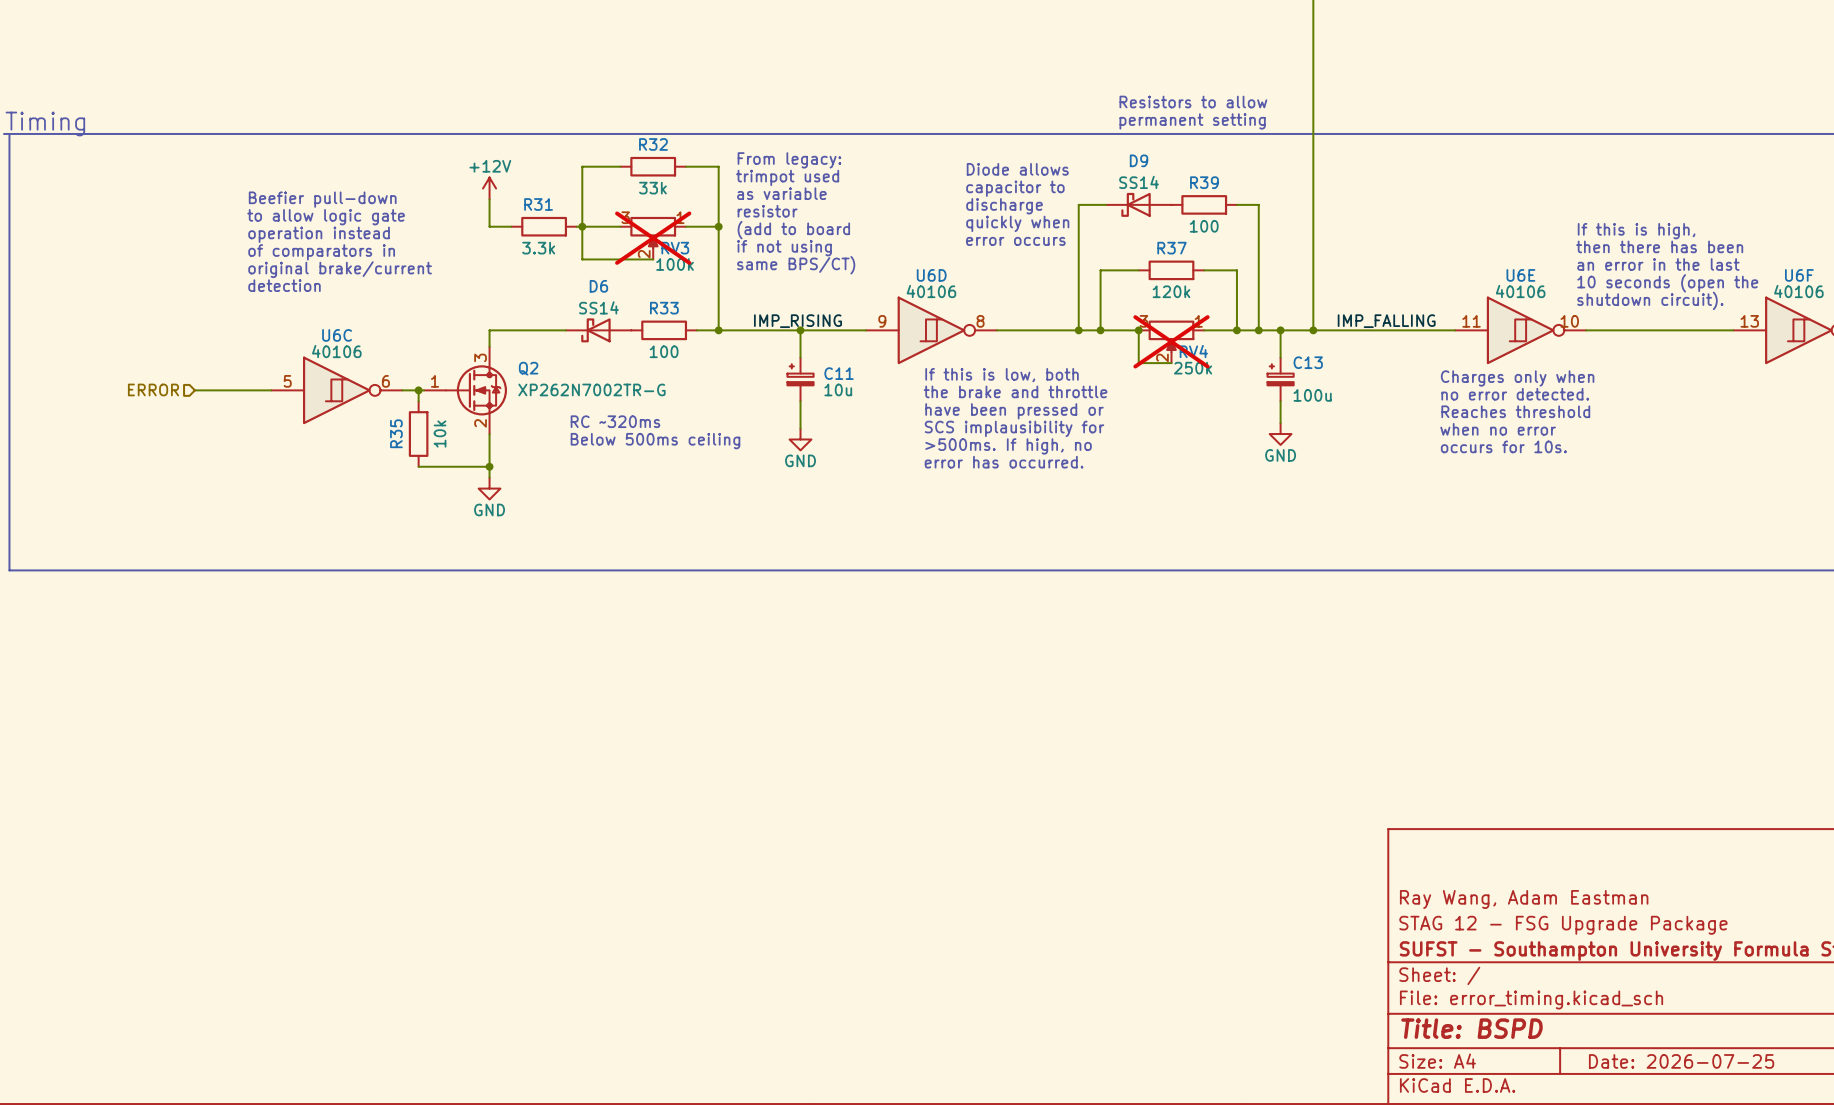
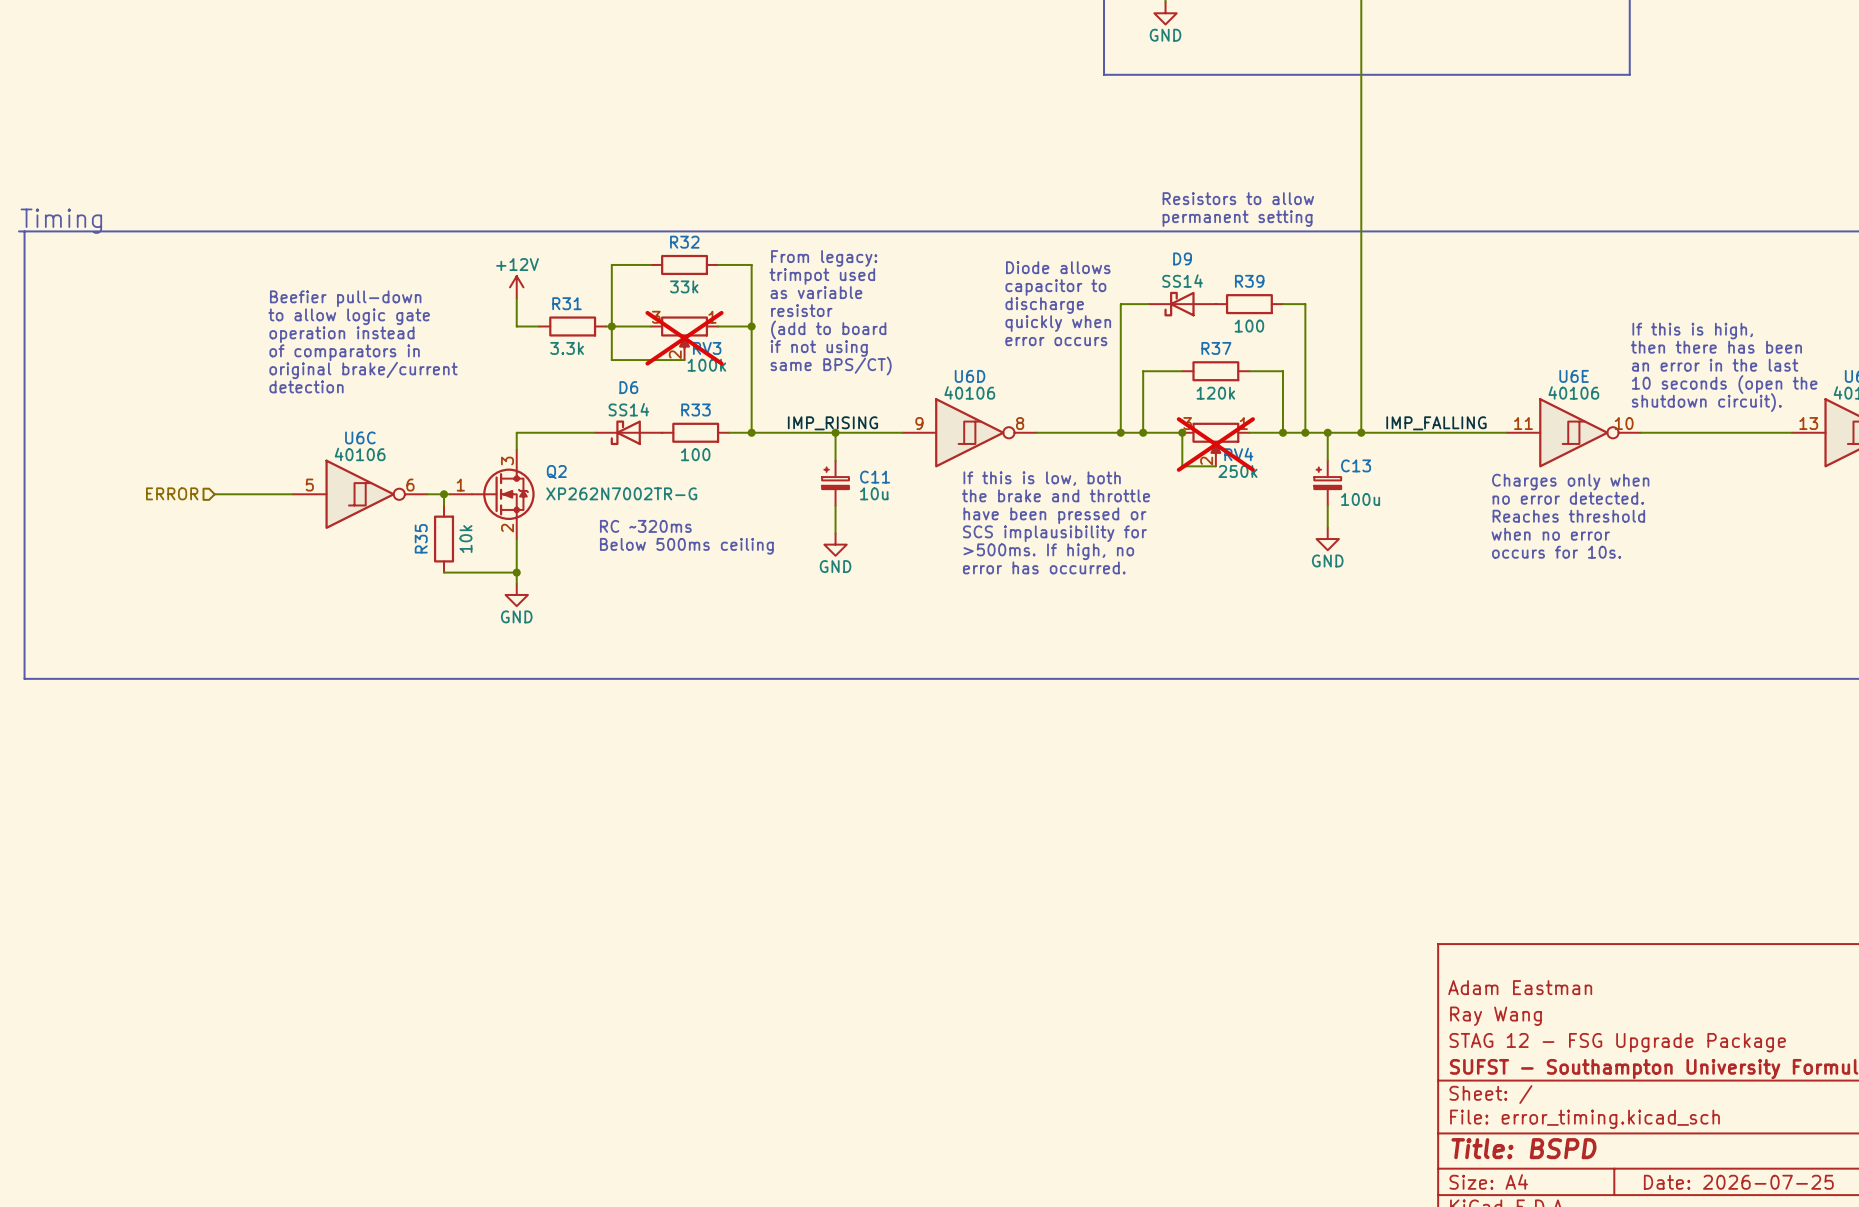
title block: none -> Adam Eastman (1520, 987)
title block: Ray Wang, Adam Eastman (1524, 899) -> Ray Wang (1495, 1016)

